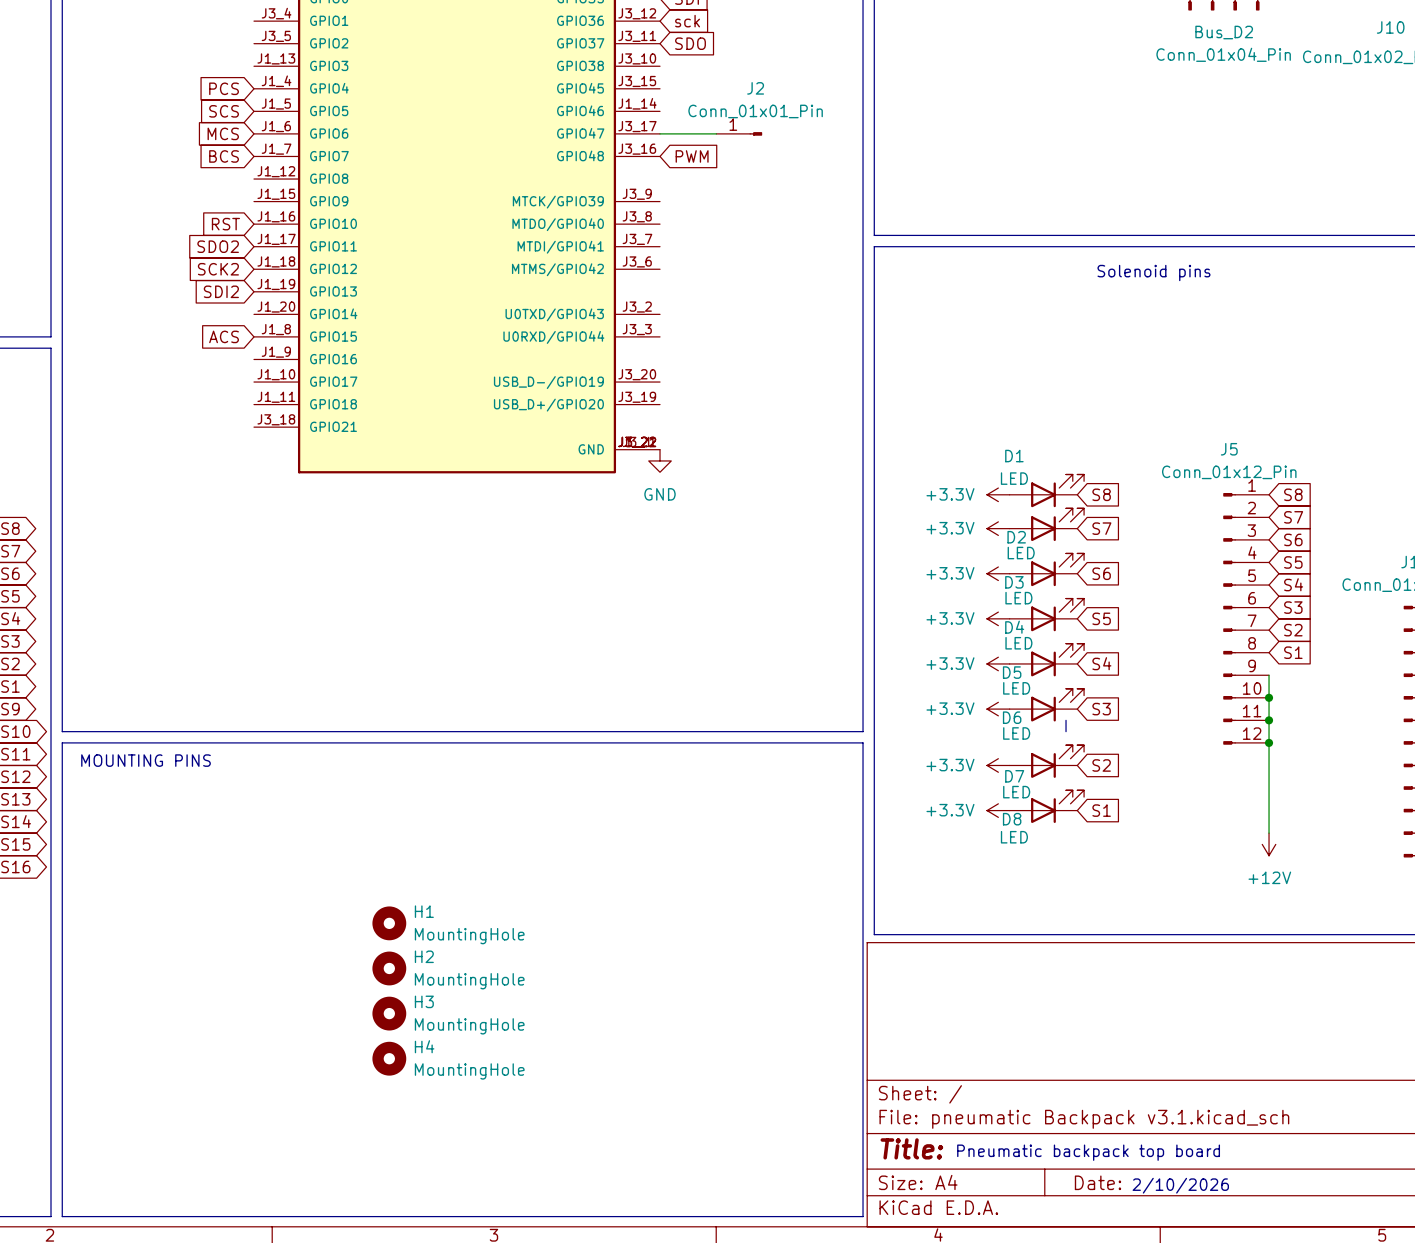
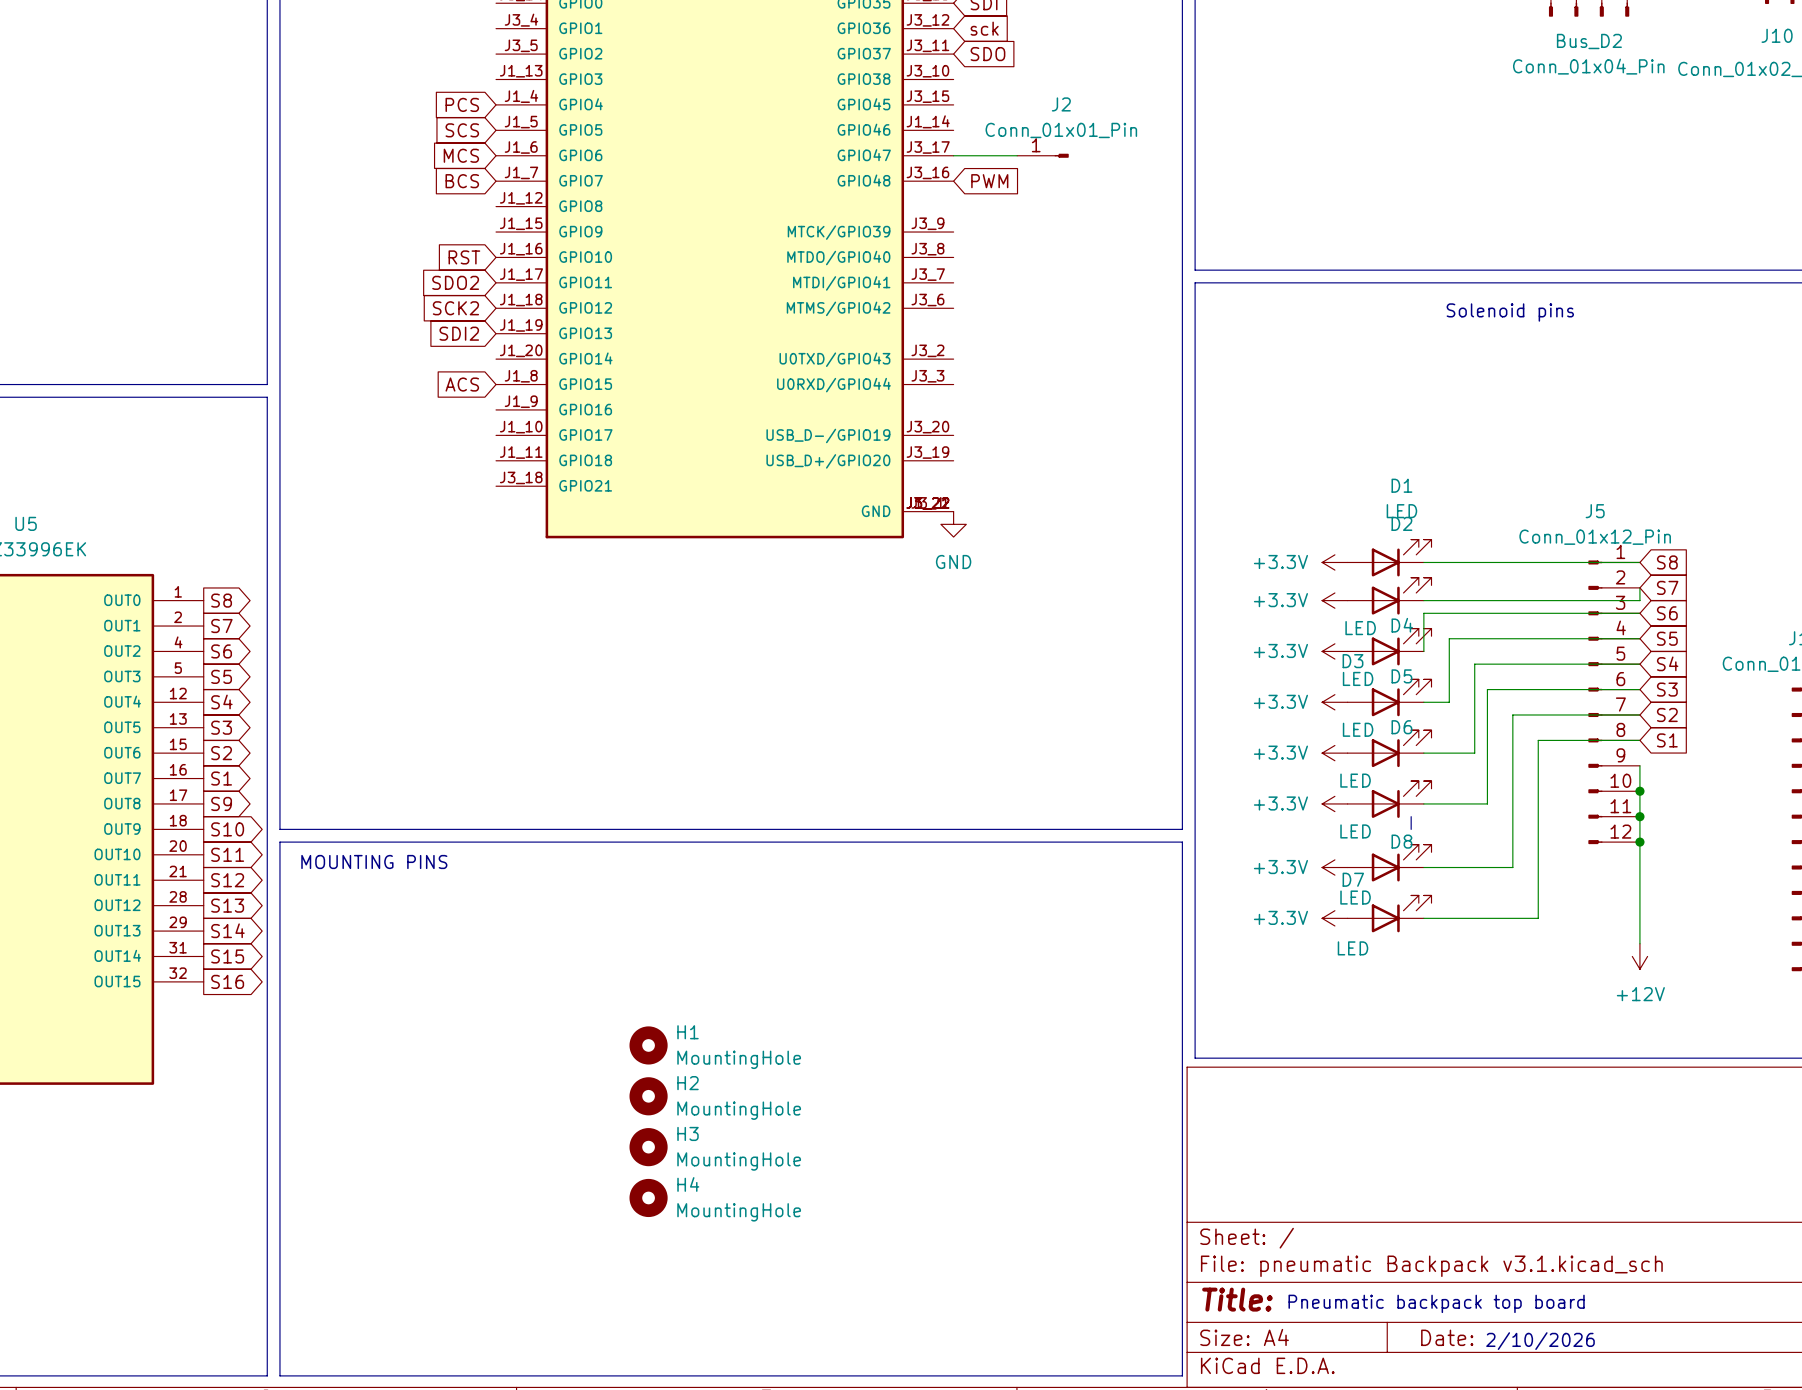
D1 name position: D1 (1014, 456) -> D1 (1401, 485)
D1 value position: LED (1014, 478) -> LED (1401, 511)
wire: none -> (1423, 562) (1639, 562)
global label: S8 (1101, 494) -> none
wire: none -> (1639, 587) (1639, 600) (1423, 600)
global label: S7 (1101, 528) -> none
D2 name position: D2 (1016, 537) -> D2 (1401, 523)
wire: none -> (1639, 613) (1423, 613) (1423, 651)
wire: none -> (1639, 638) (1449, 638) (1449, 702) (1423, 702)
global label: S6 (1101, 573) -> none
wire: none -> (1639, 664) (1474, 664) (1474, 753) (1423, 753)
wire: none -> (1639, 689) (1487, 689) (1487, 803) (1423, 803)
global label: S5 (1101, 618) -> none
D4 name position: D4 (1014, 627) -> D4 (1402, 625)
wire: none -> (1639, 714) (1512, 714) (1512, 867) (1423, 867)
wire: none -> (1639, 740) (1538, 740) (1538, 918) (1423, 918)
global label: S4 (1101, 663) -> none
D5 name position: D5 (1012, 672) -> D5 (1401, 676)
global label: S3 (1101, 709) -> none
D6 name position: D6 (1012, 717) -> D6 (1401, 727)
global label: S2 (1101, 765) -> none
global label: S1 (1101, 810) -> none
D8 name position: D8 (1012, 819) -> D8 (1401, 841)

